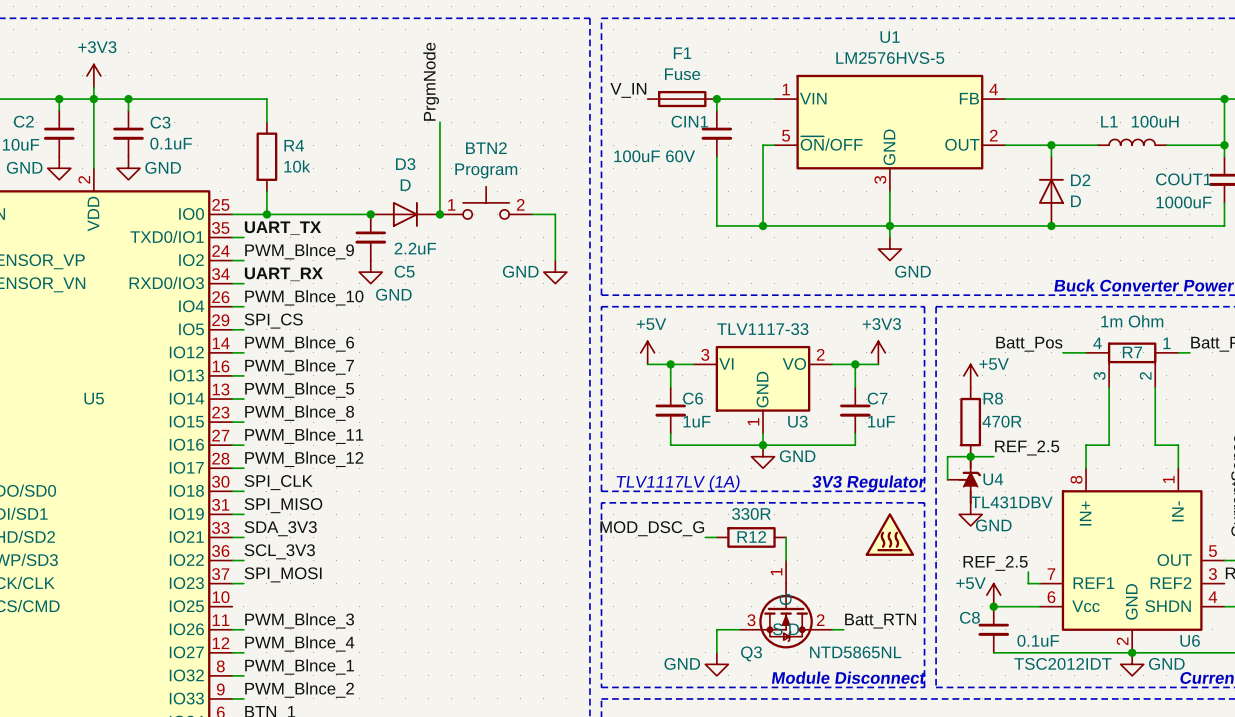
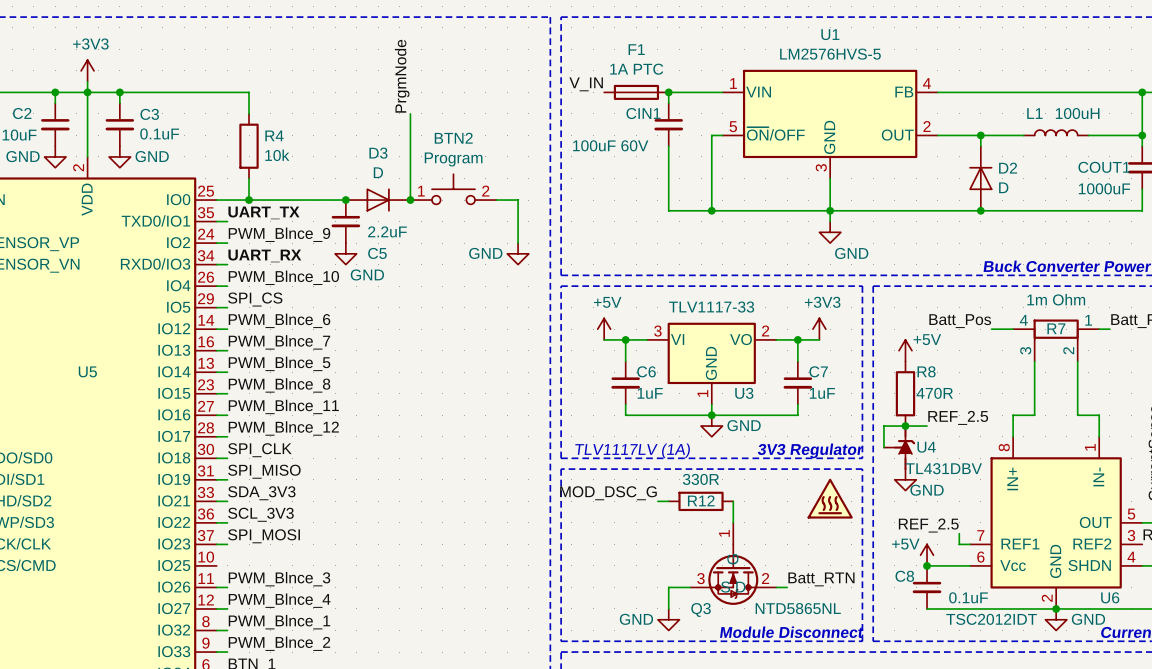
F1 value: Fuse (682, 74) -> 1A PTC (636, 69)

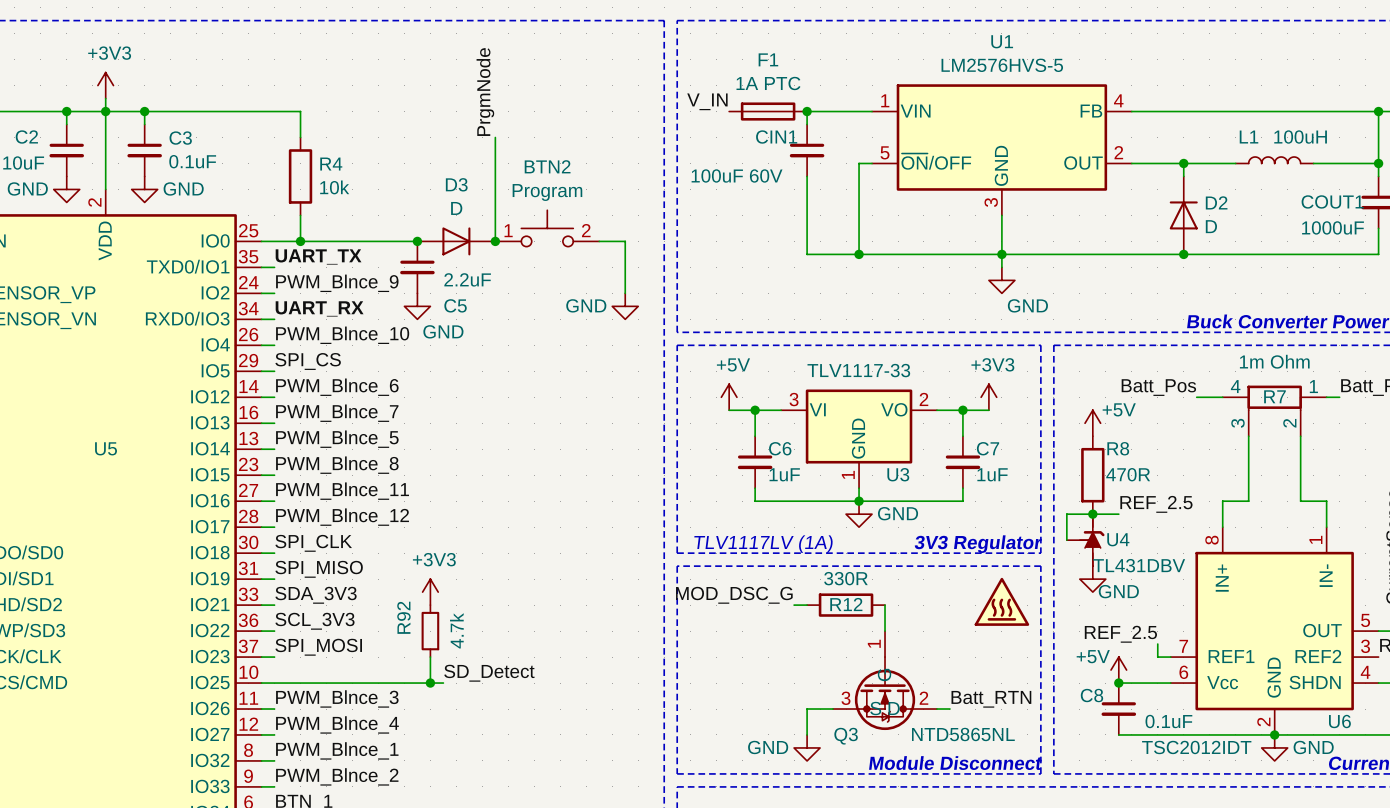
power symbol: none -> +3V3 (430, 592)
R92: none -> 4.7k (430, 631)
wire: none -> (430, 657) (430, 683)
label: none -> SD_Detect (489, 673)
wire: none -> (261, 683) (443, 683)
junction: none -> (430, 683)

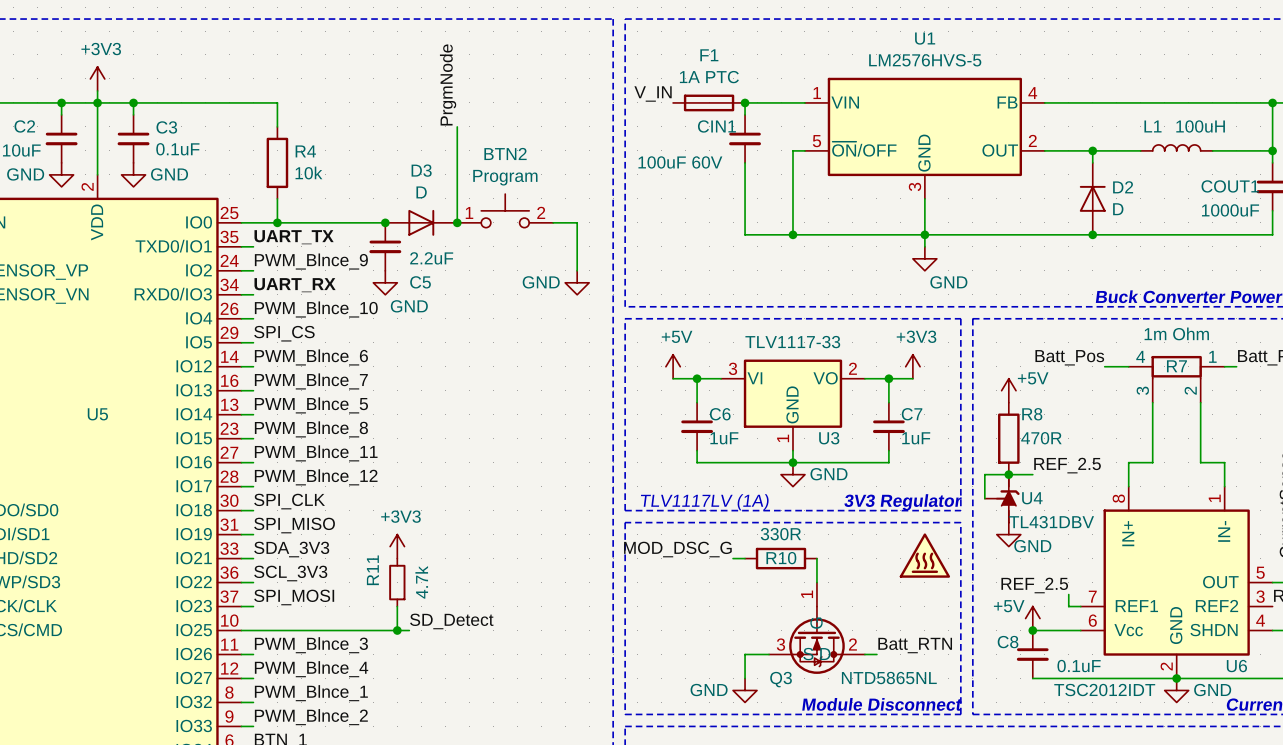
R12 name: R12 (846, 604) -> R10 (781, 558)
R92 name: R92 (403, 617) -> R11 (372, 570)

